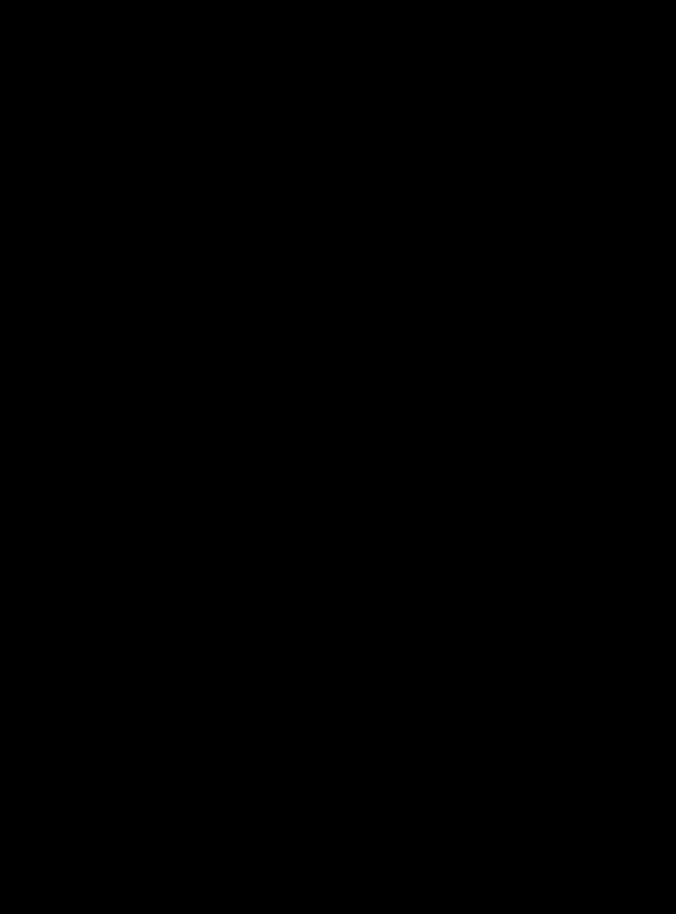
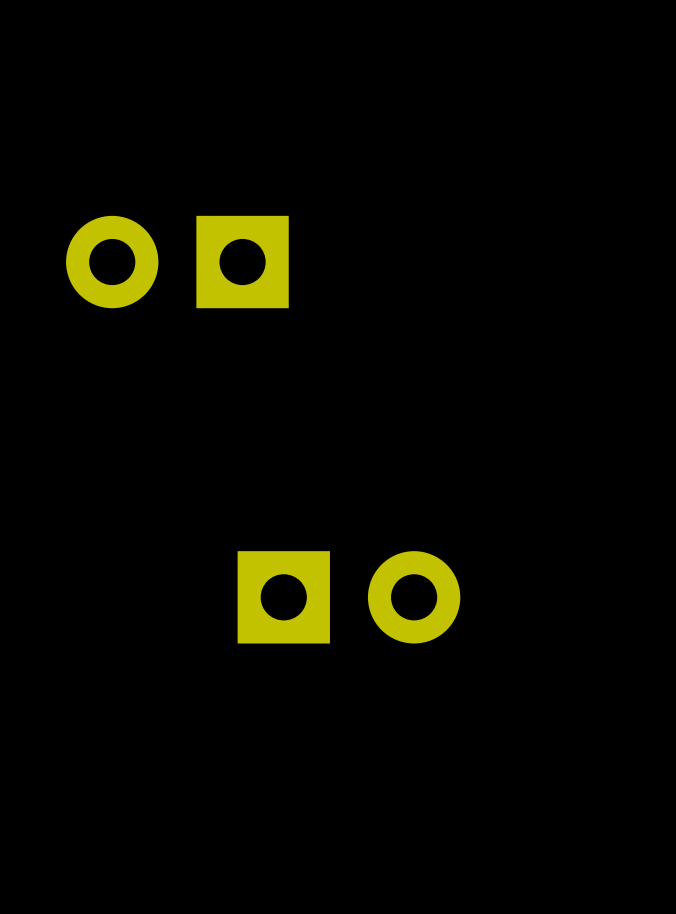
part: none -> (177, 262)
part: none -> (348, 597)

